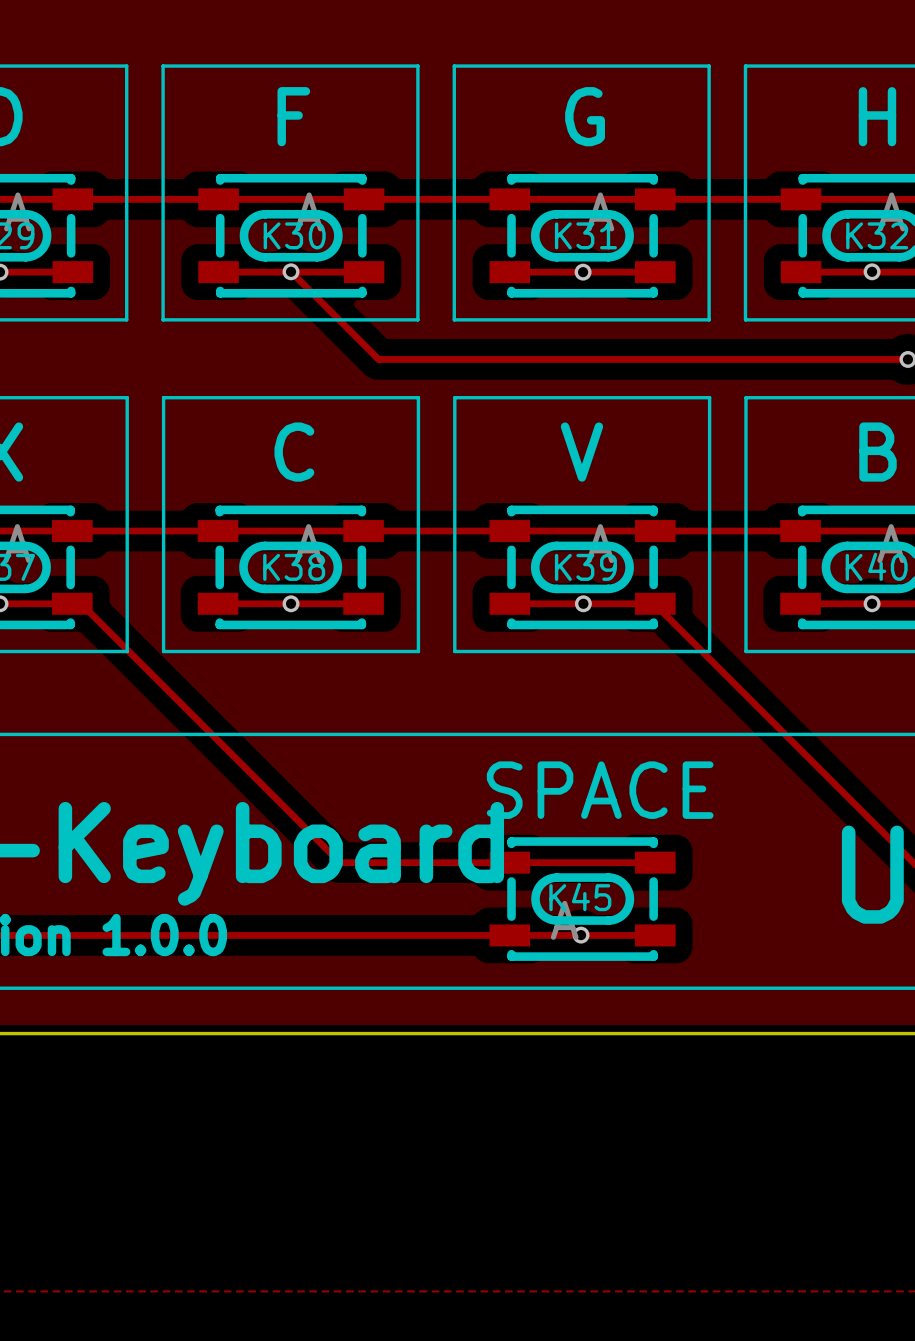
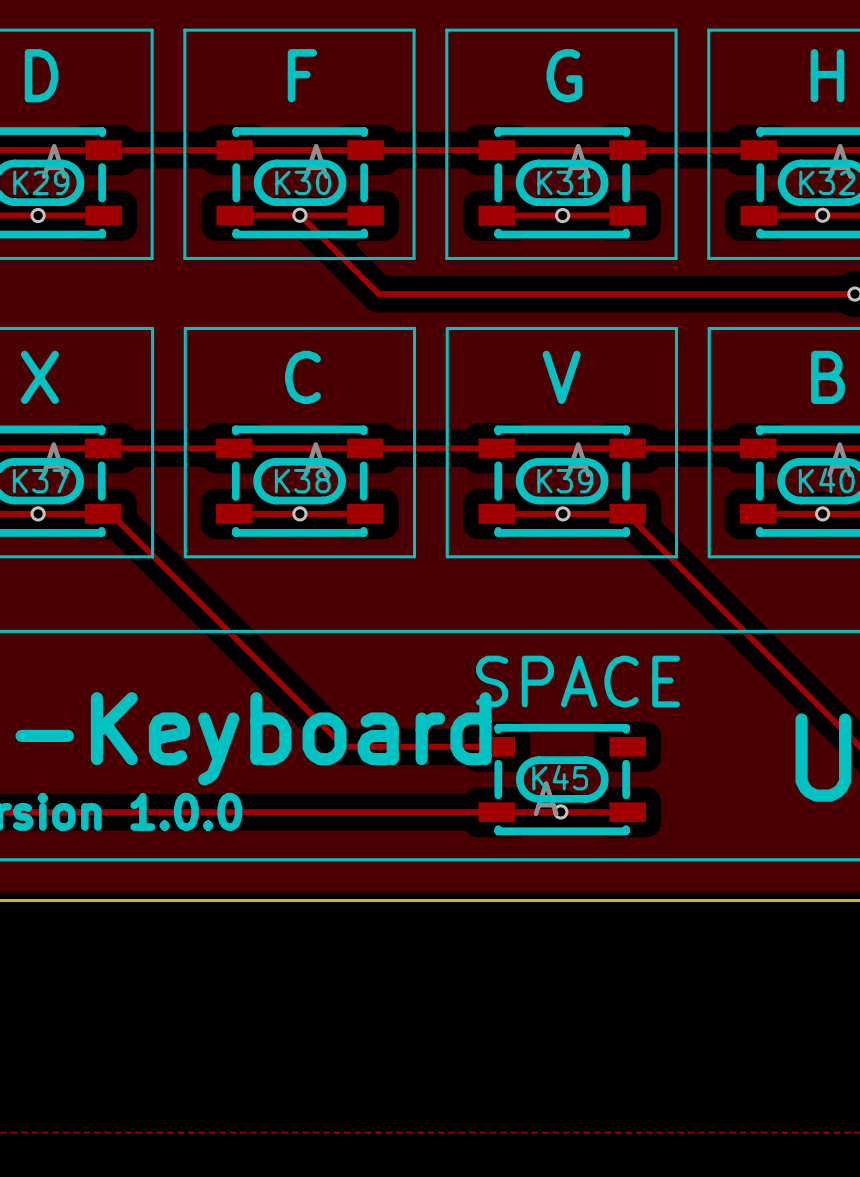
track: (509, 862) (655, 862) -> none

